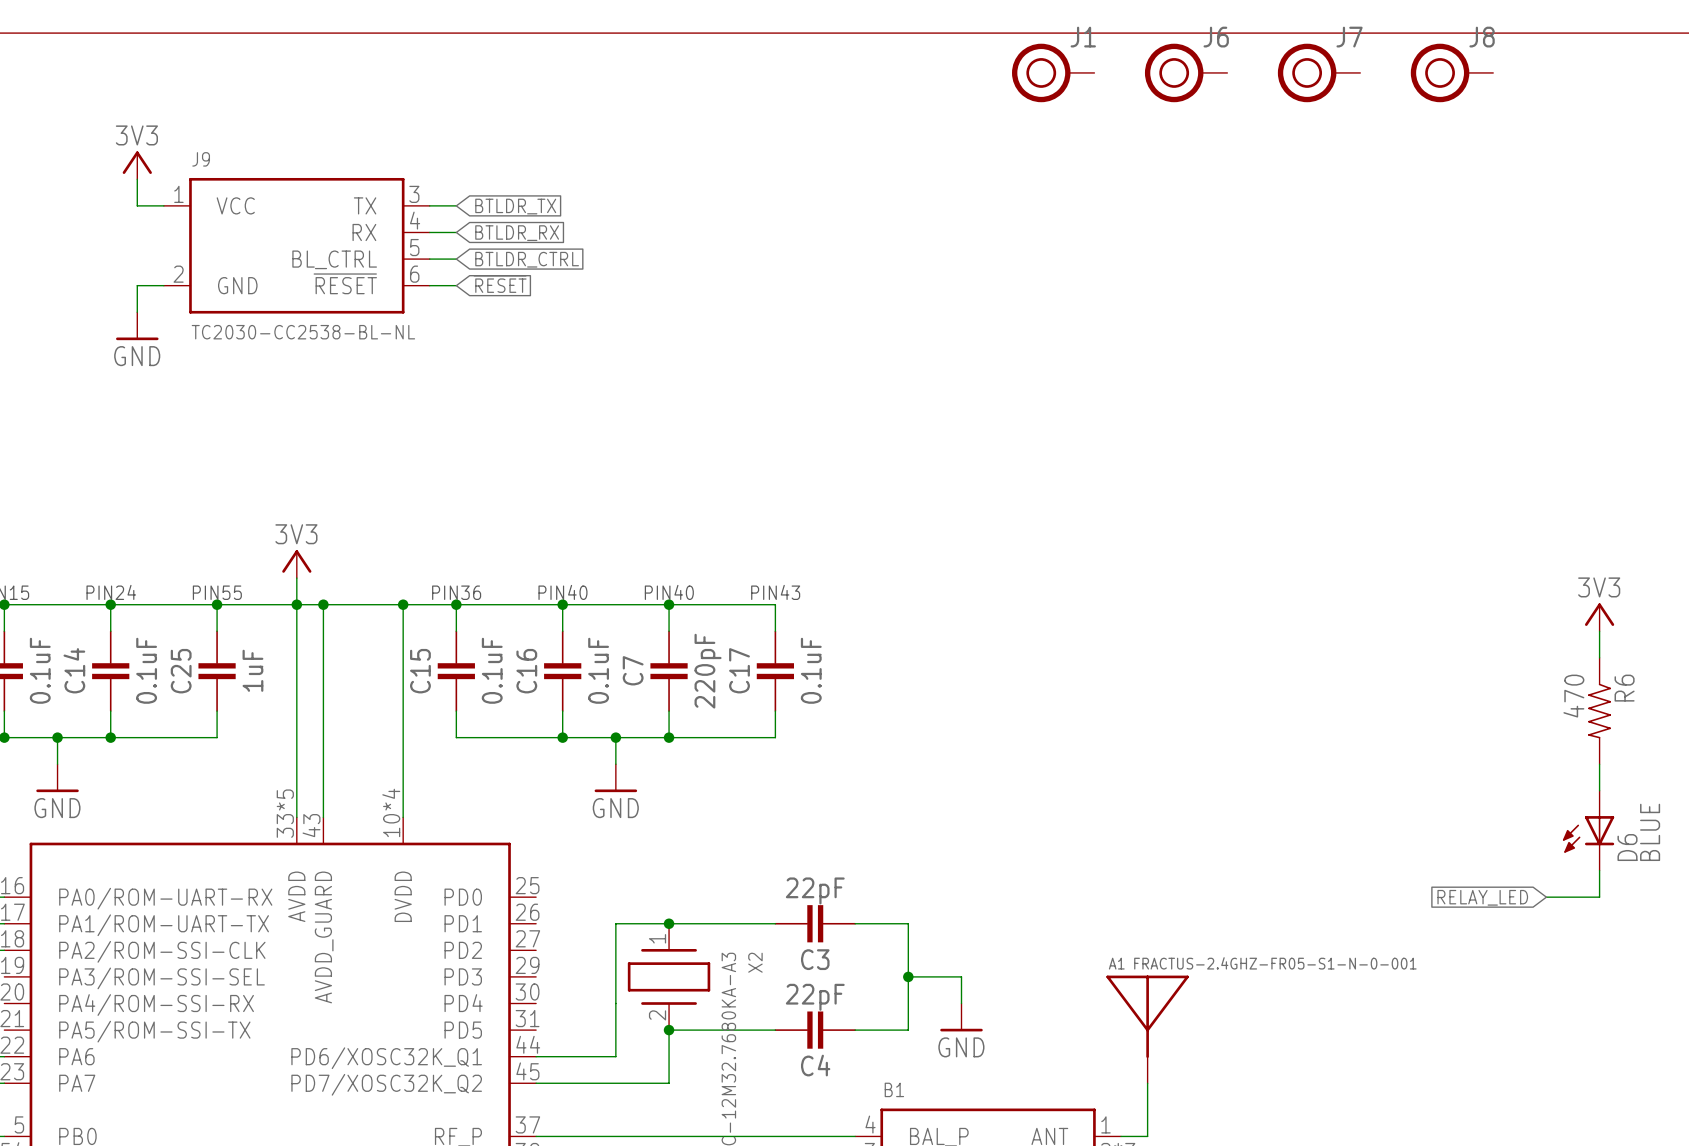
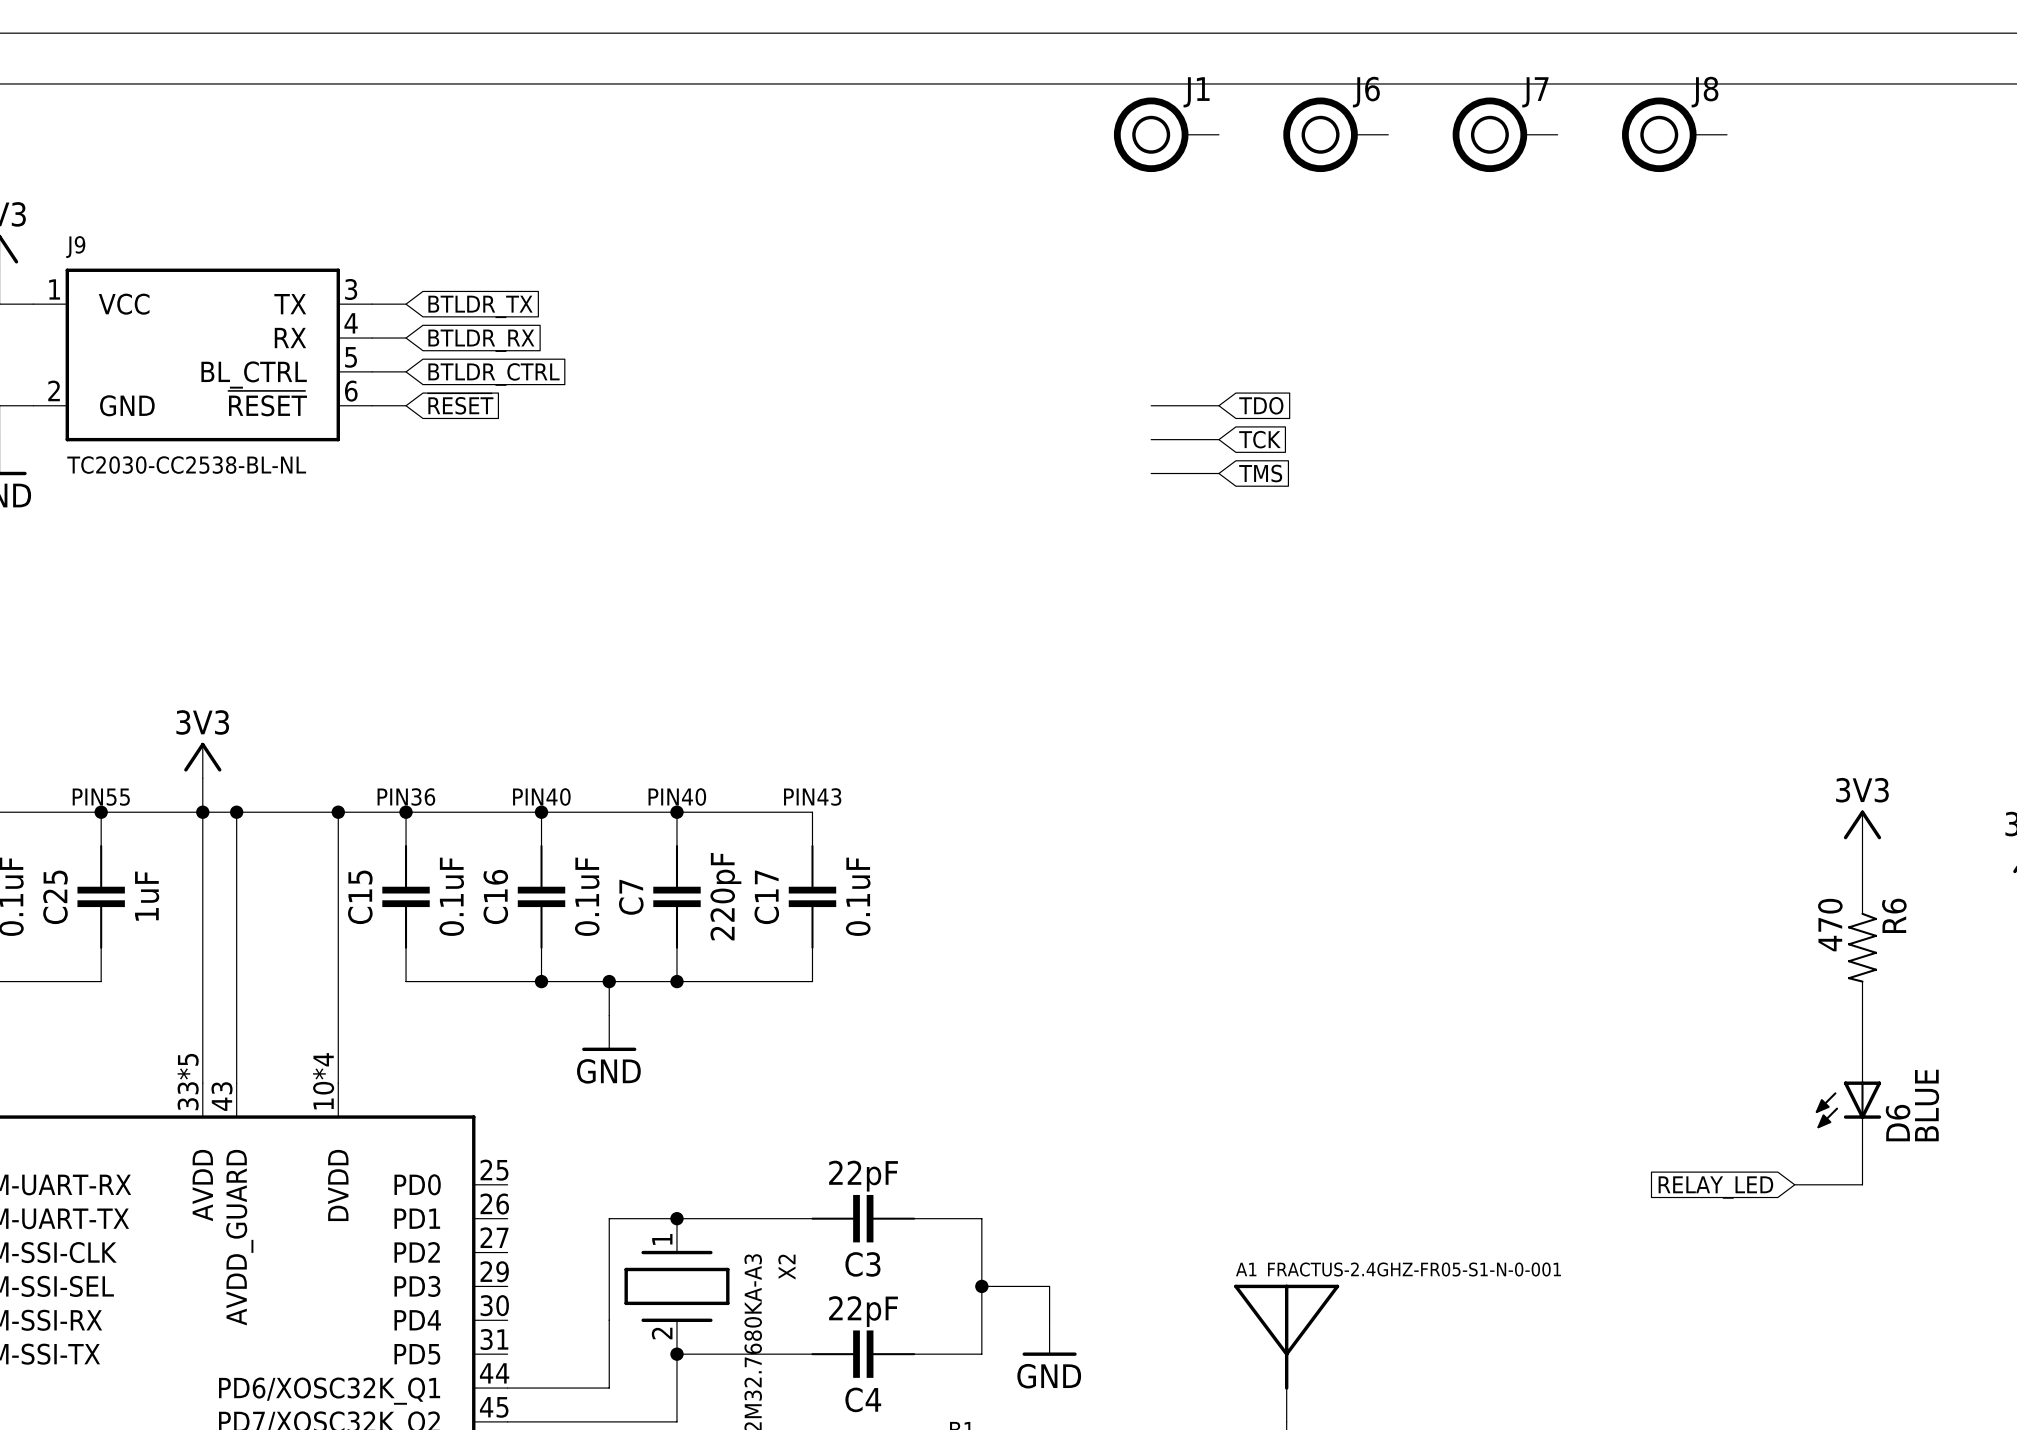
wire: none -> (1151, 405) (1218, 405)
global label: none -> TDO (1261, 405)
wire: none -> (1151, 439) (1218, 439)
global label: none -> TCK (1259, 439)
wire: none -> (1151, 473) (1218, 473)
global label: none -> TMS (1260, 473)

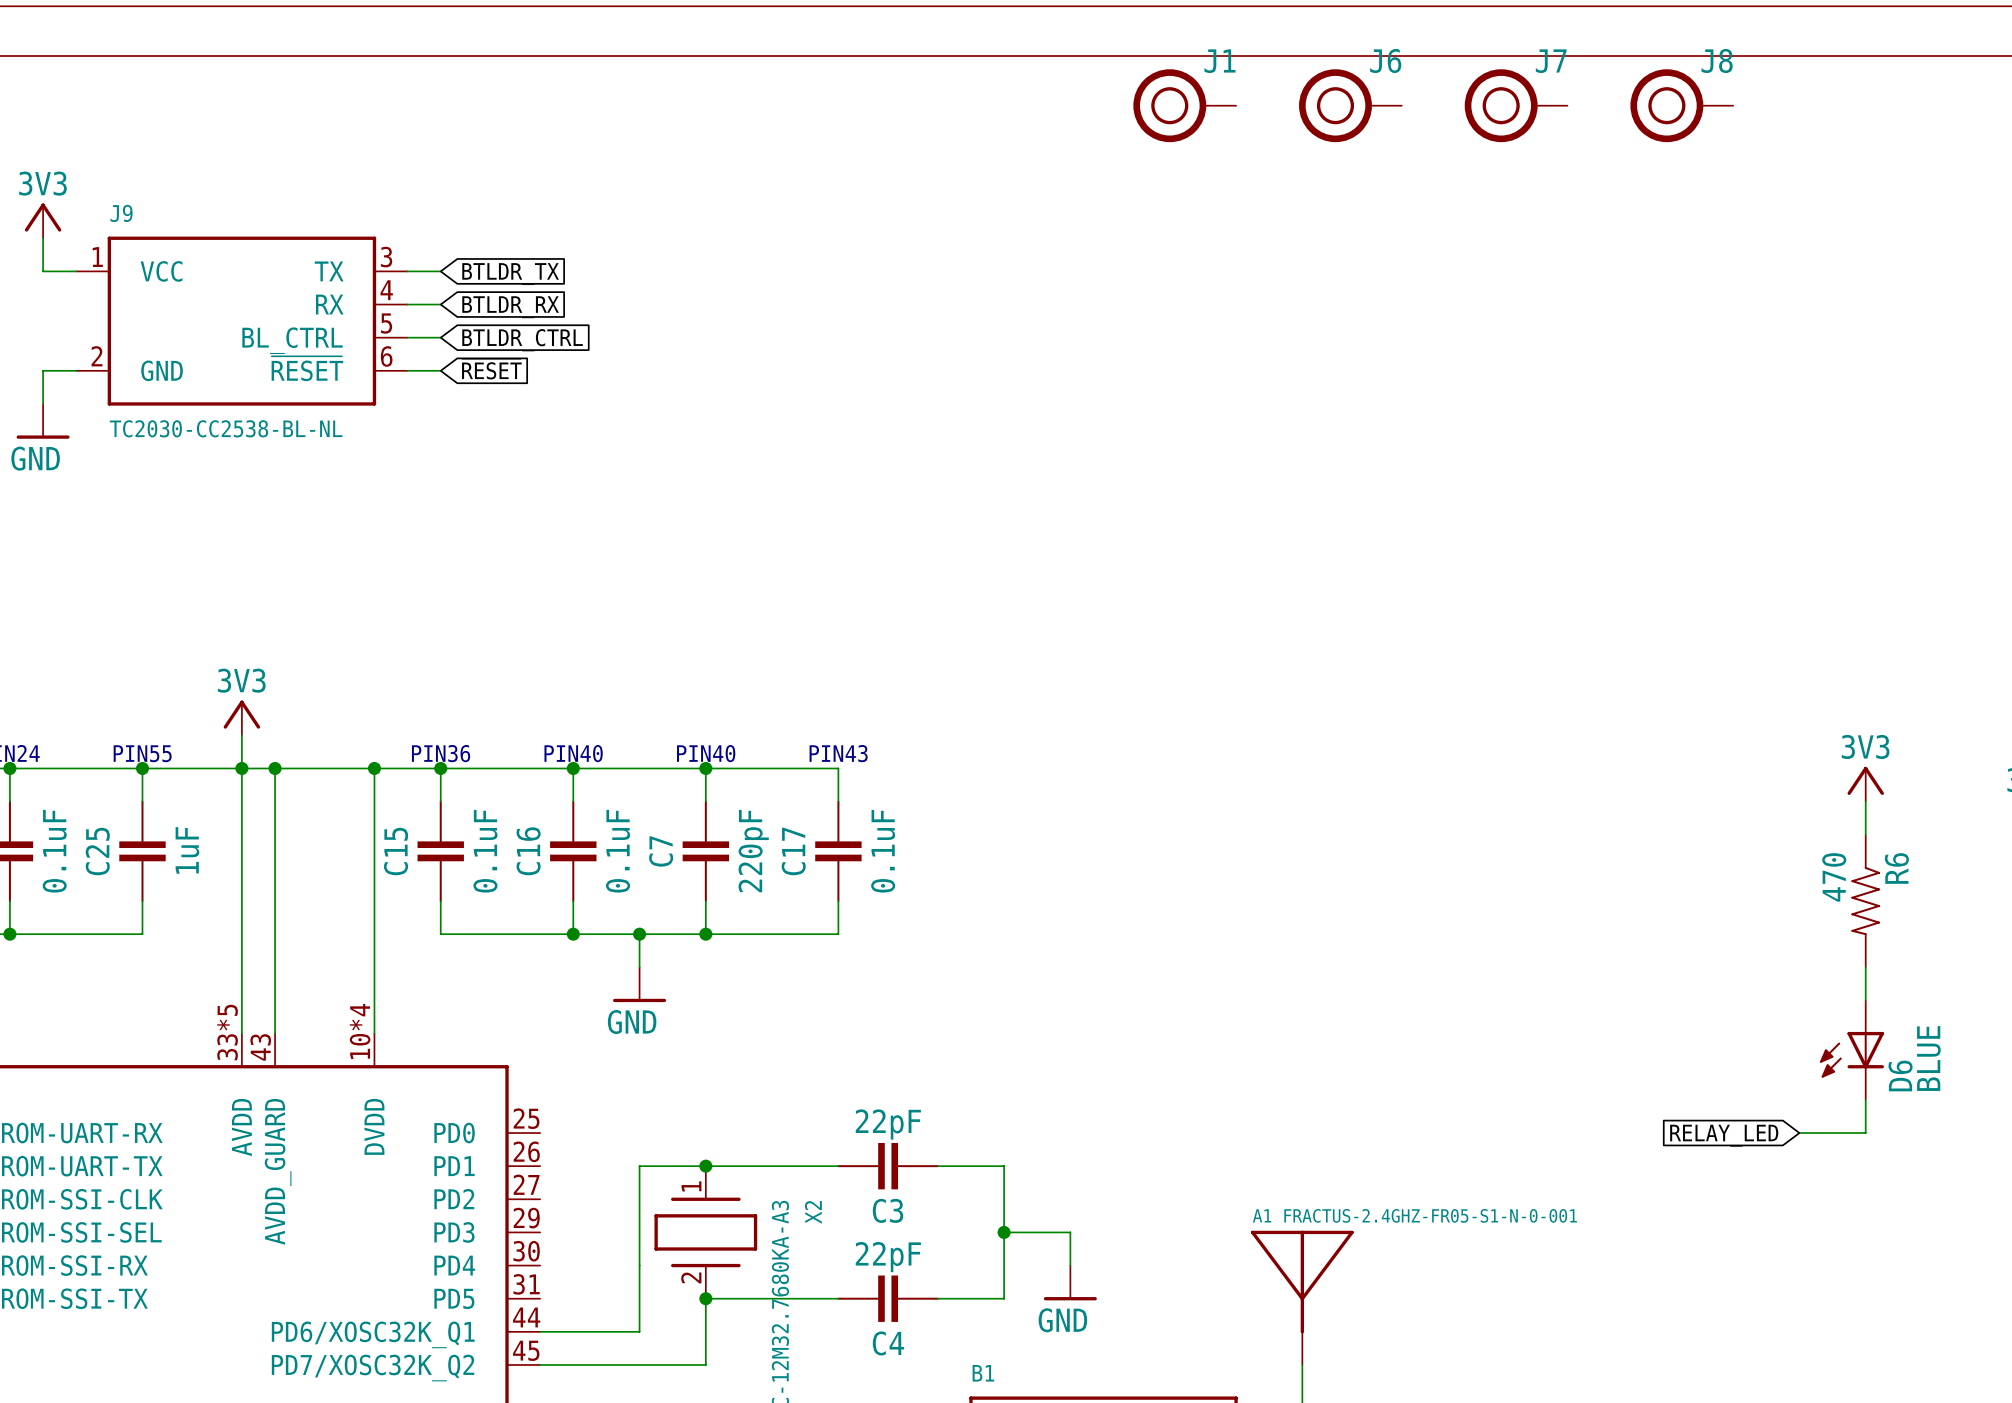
wire: (1151, 405) (1218, 405) -> none
global label: TDO (1261, 405) -> none
wire: (1151, 439) (1218, 439) -> none
global label: TCK (1259, 439) -> none
wire: (1151, 473) (1218, 473) -> none
global label: TMS (1260, 473) -> none

